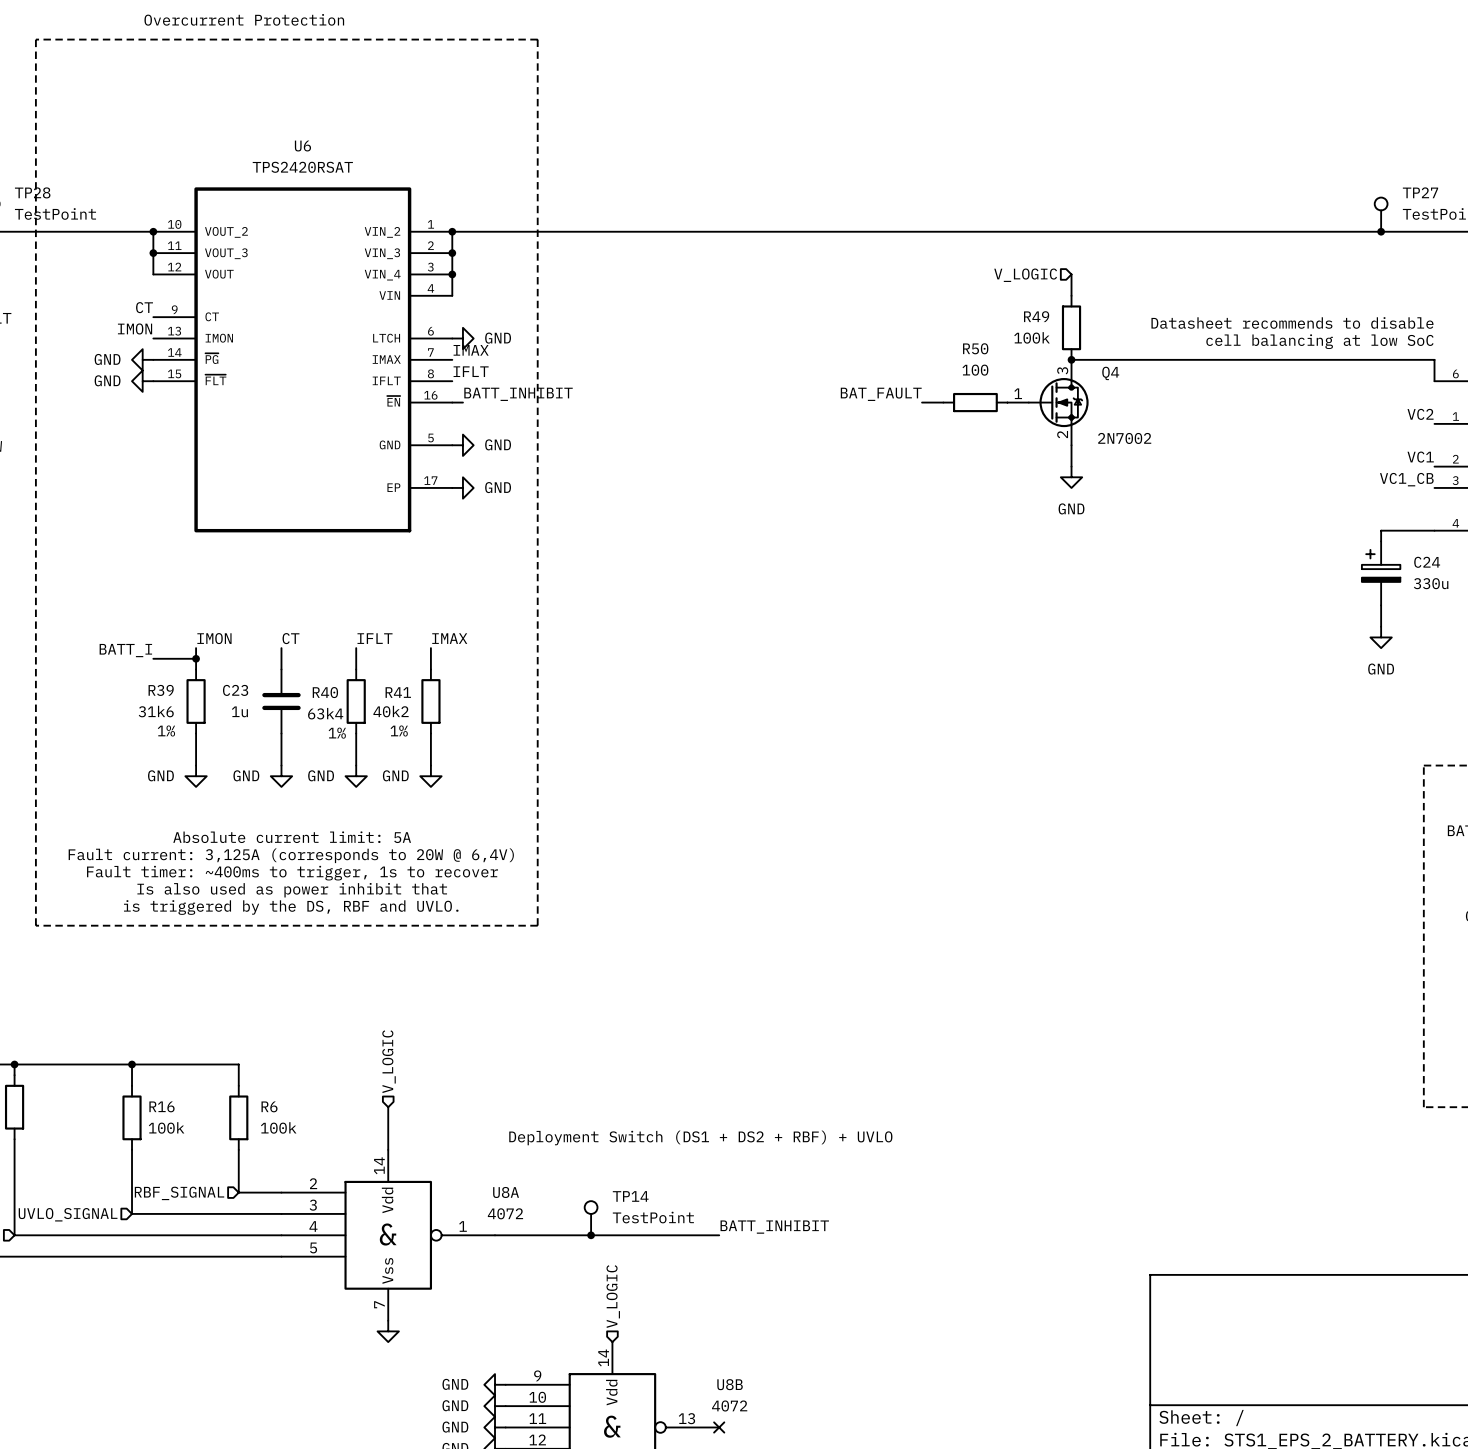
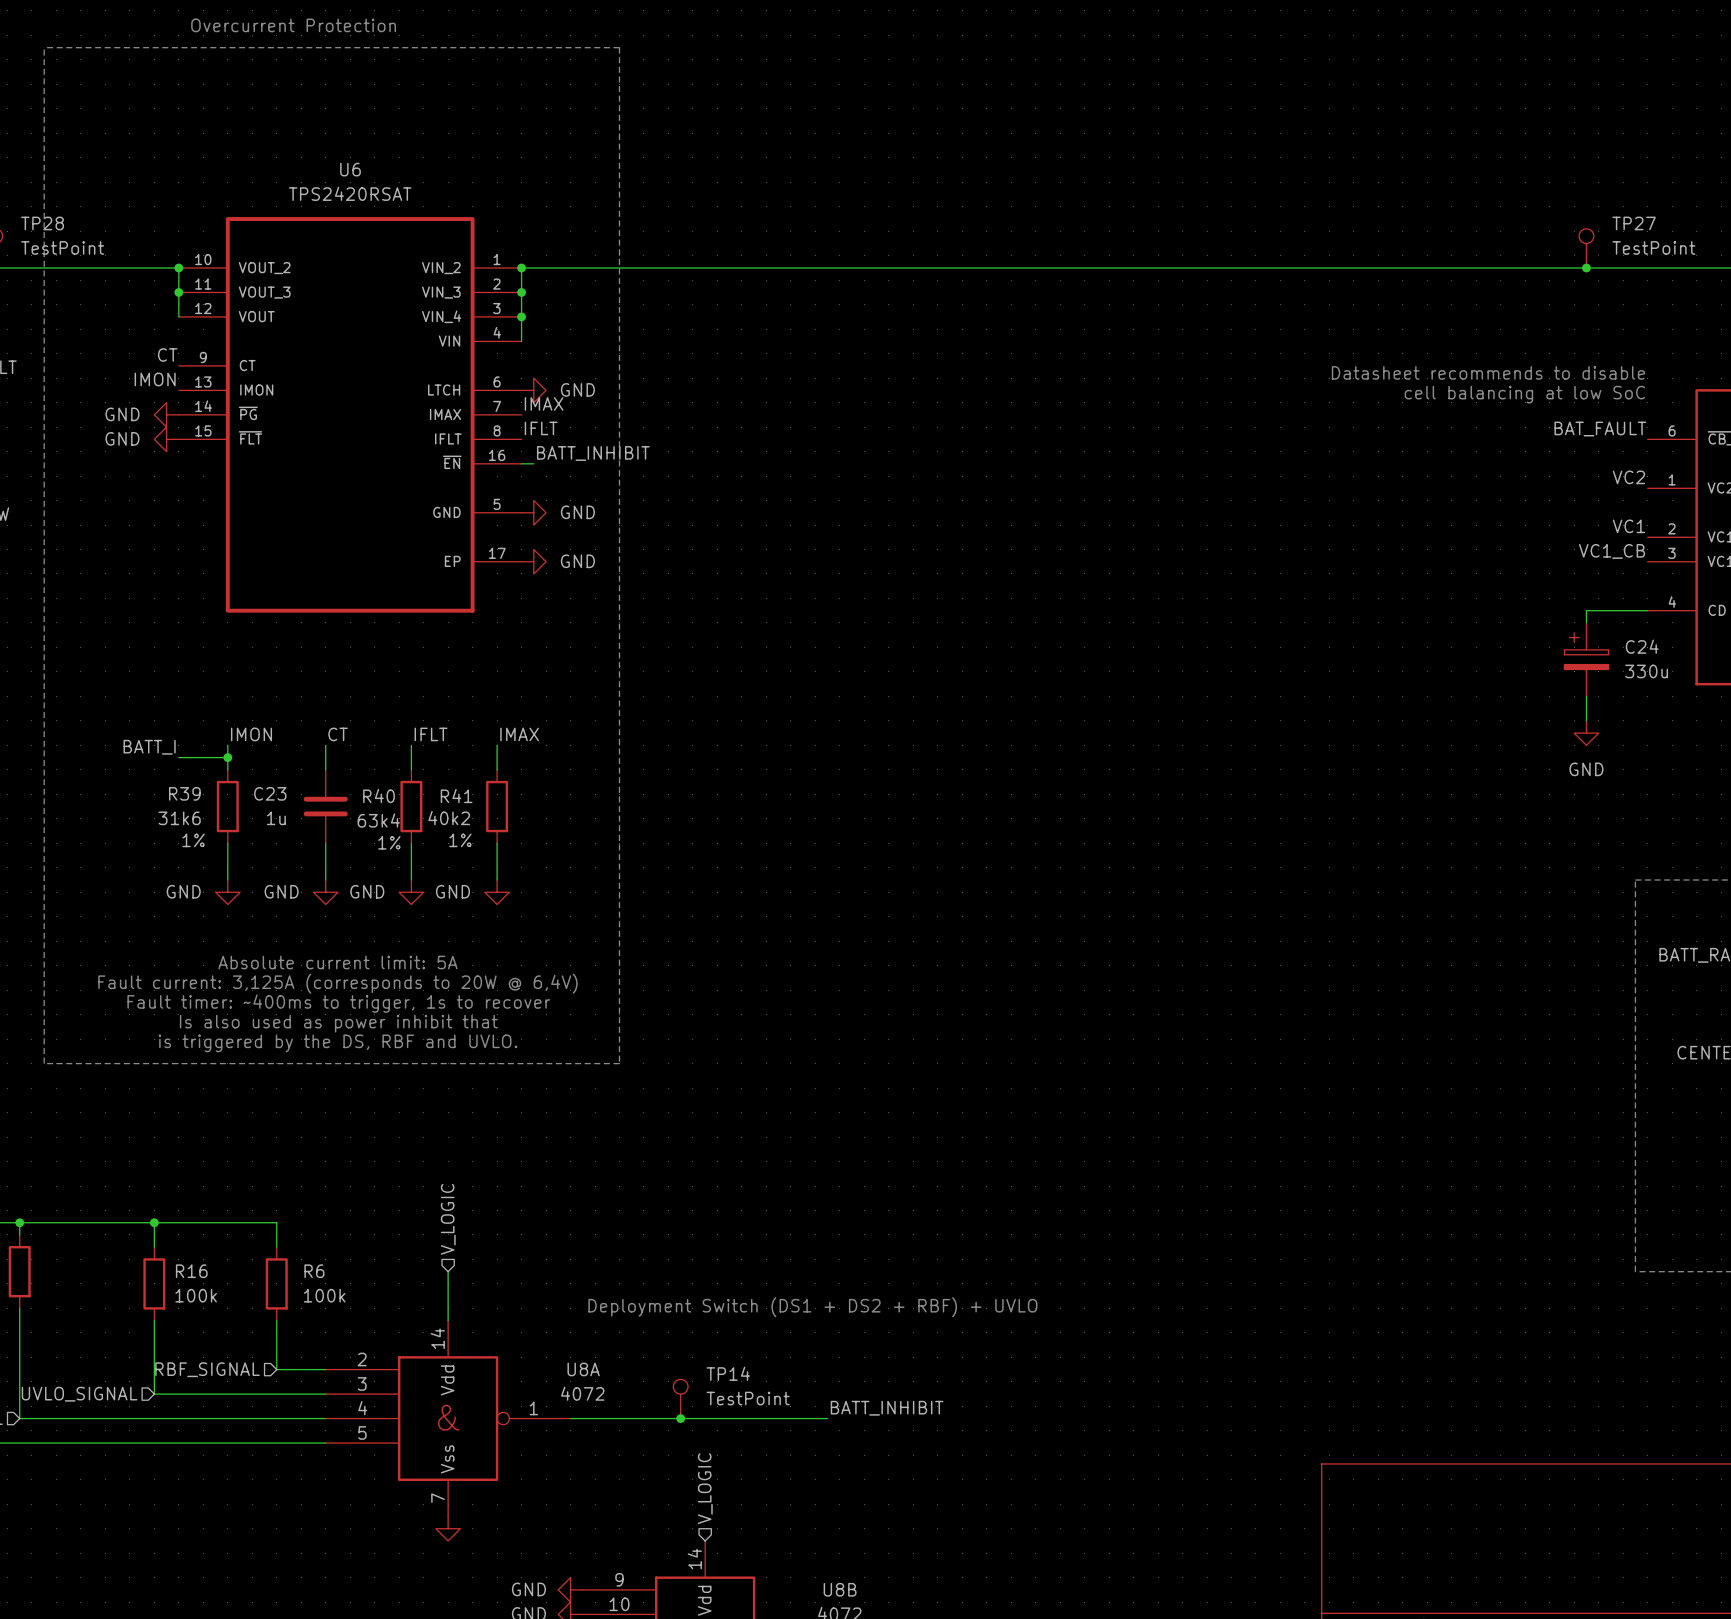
wire: (1071, 274) (1071, 295) -> none
hierarchical label: V_LOGIC (1025, 275) -> none
R49: 100k (1071, 327) -> none
wire: (1071, 359) (1434, 359) (1434, 381) -> none
junction: (1071, 359) -> none
label: none -> BAT_FAULT (1600, 429)
label: BAT_FAULT (881, 394) -> none
wire: (922, 402) (943, 402) -> none
R50: 100 (975, 402) -> none
Q4: 2N7002 (1048, 402) -> none
wire: (1071, 445) (1071, 466) -> none
power symbol: GND (1071, 477) -> none

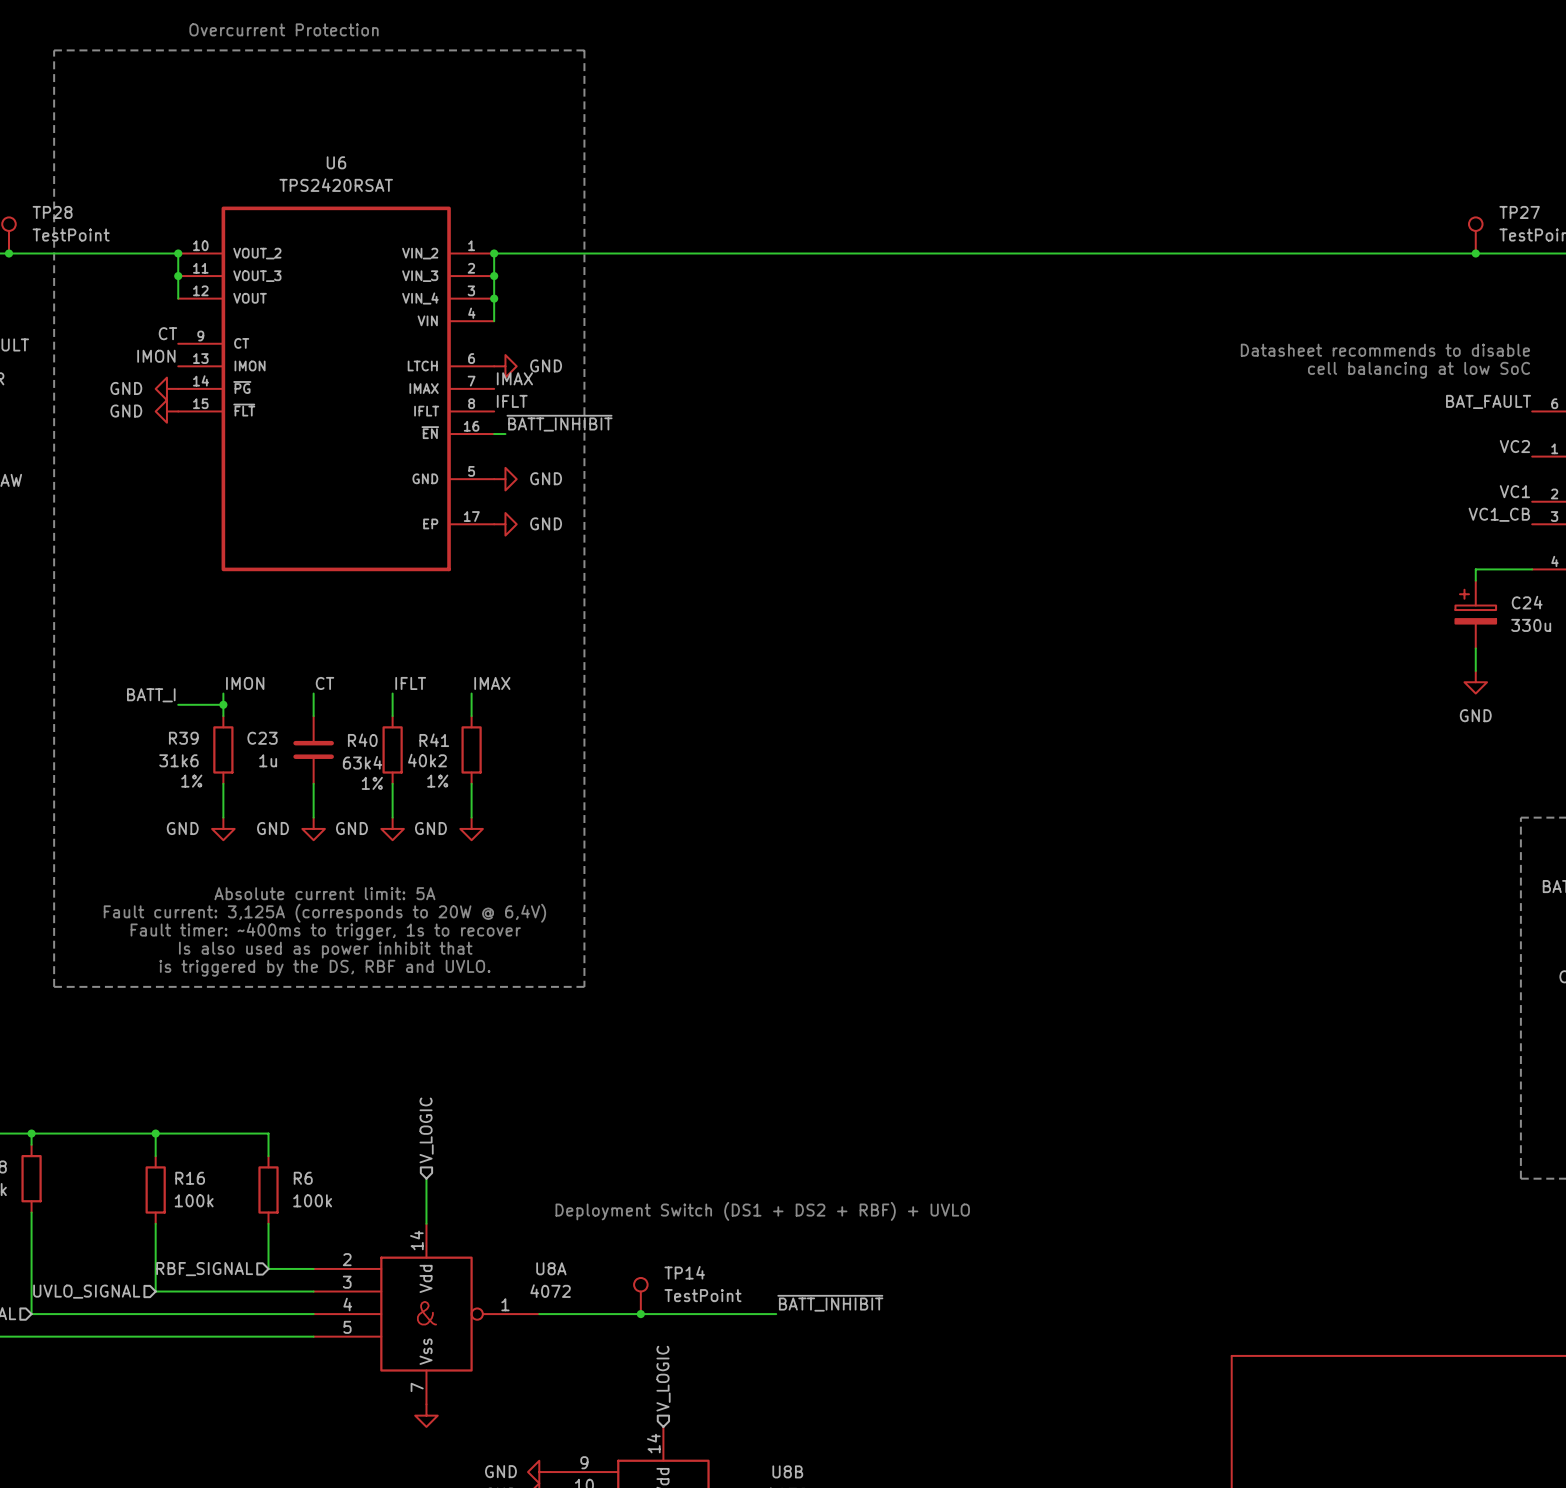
label: BATT_INHIBIT (593, 453) -> ~{BATT_INHIBIT} (559, 423)
label: BATT_INHIBIT (887, 1408) -> ~{BATT_INHIBIT} (830, 1303)

